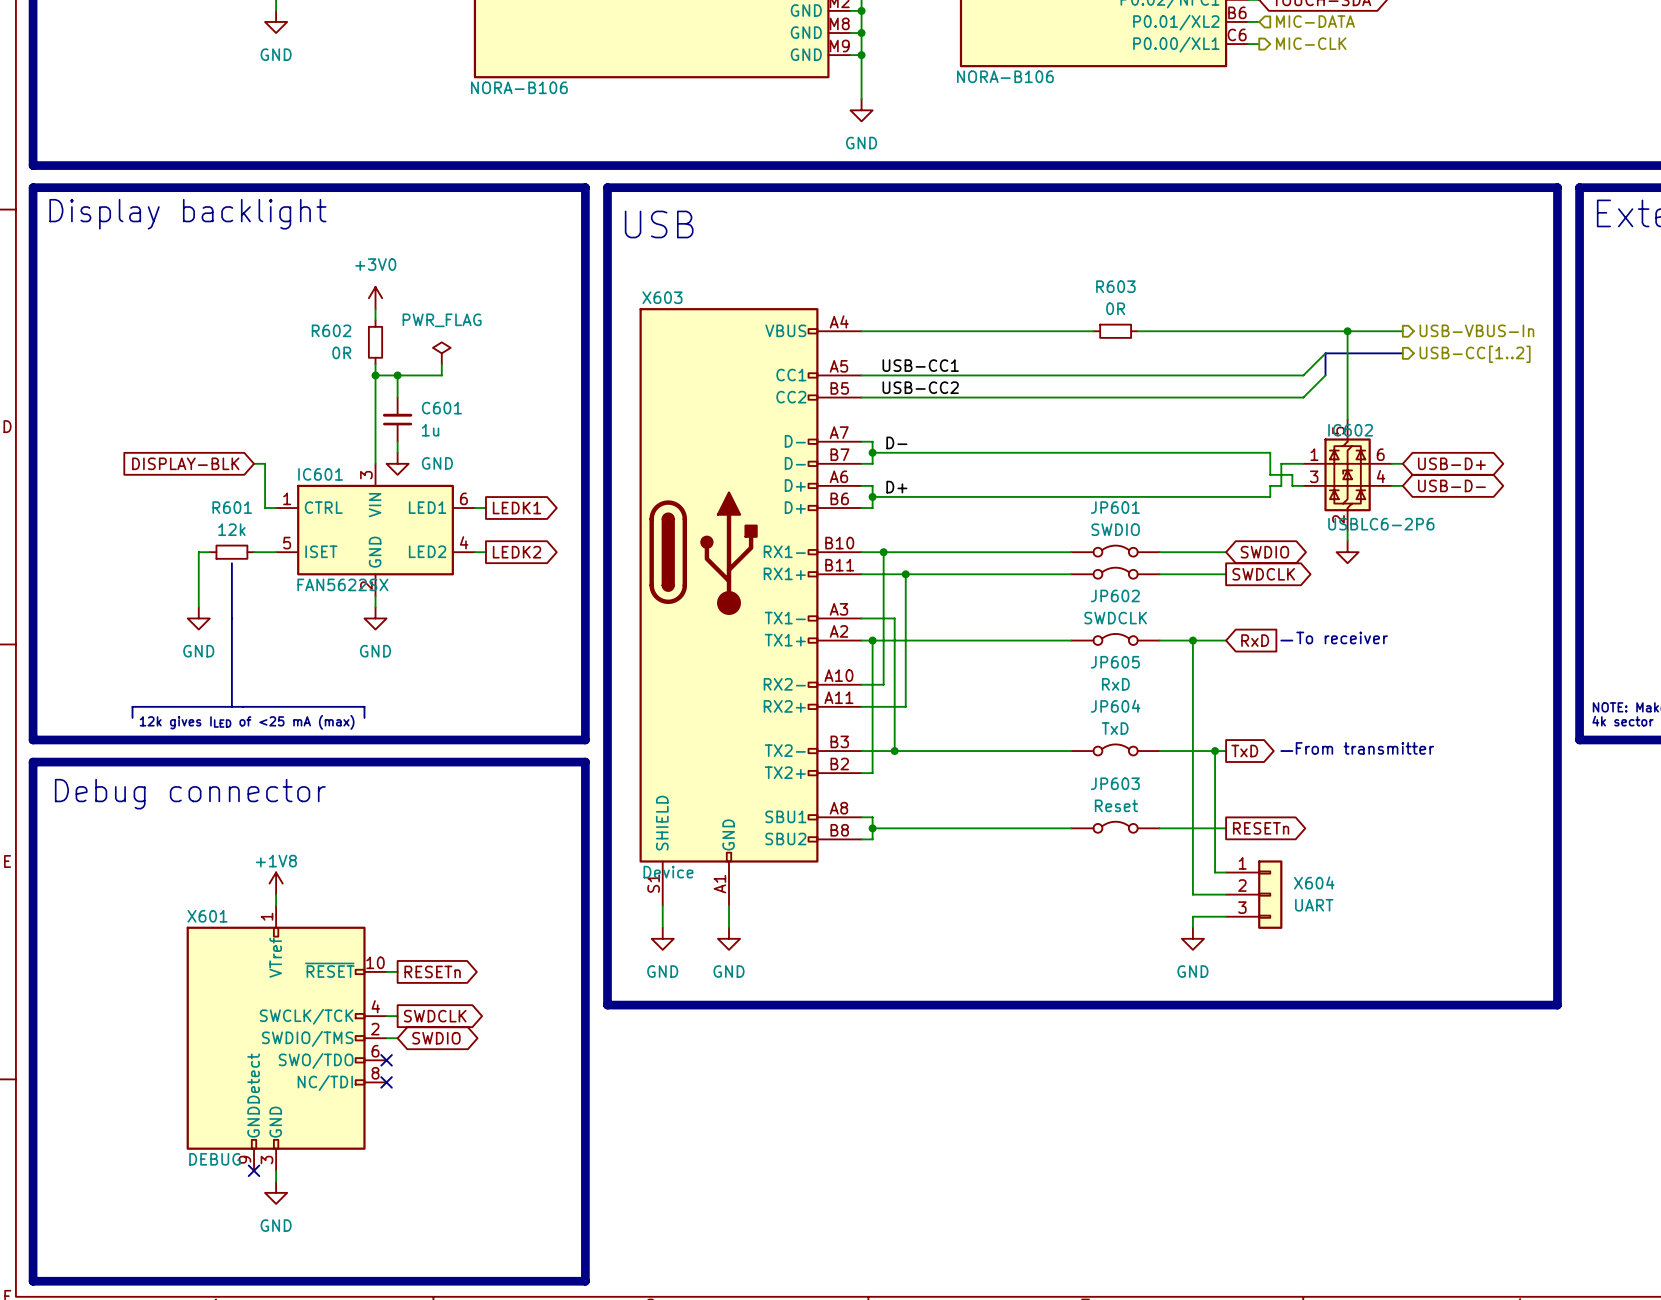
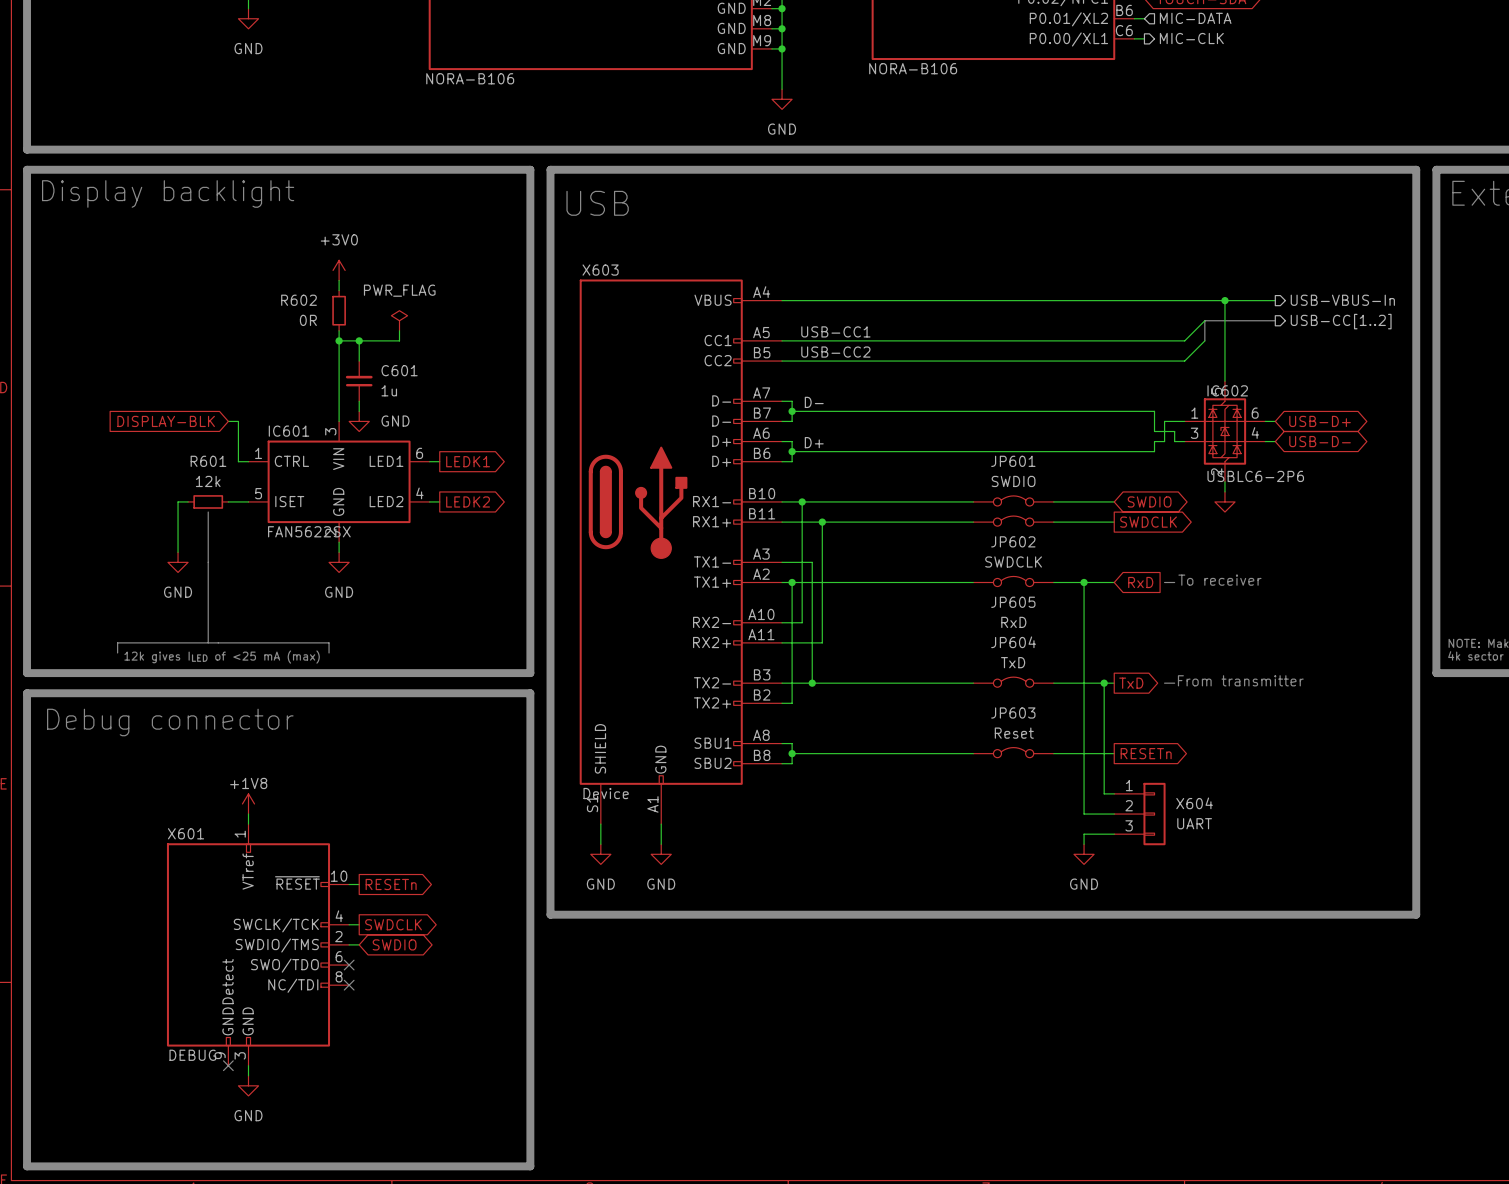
wire: none -> (993, 300) (1033, 300)
R603: 0R (1115, 331) -> none

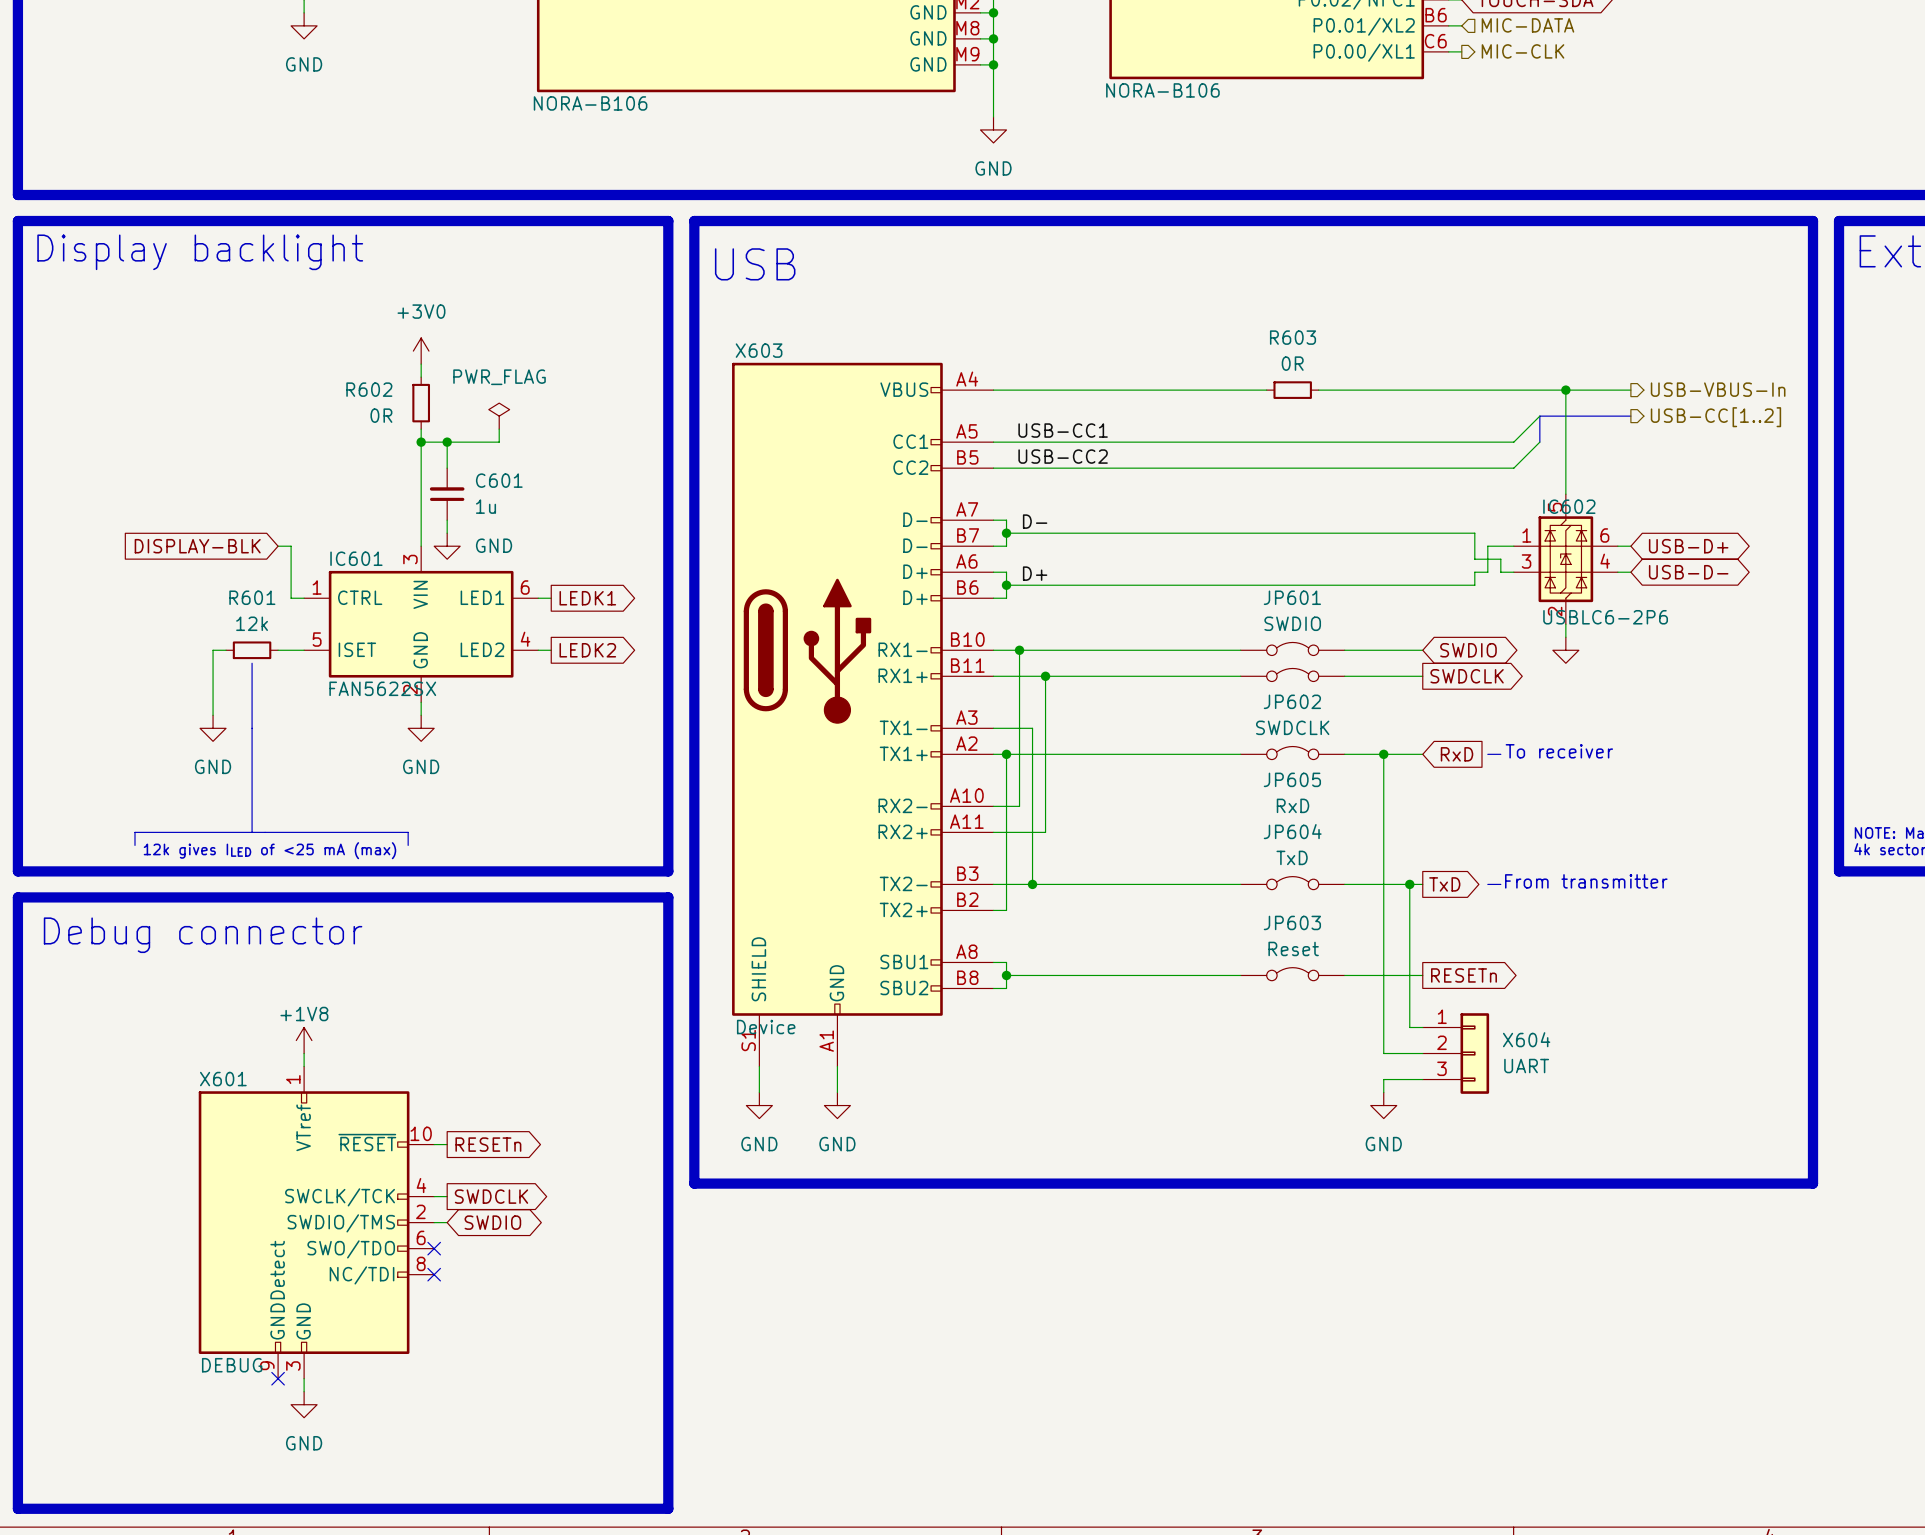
wire: (993, 300) (1033, 300) -> none
R603: none -> 0R (1292, 390)

